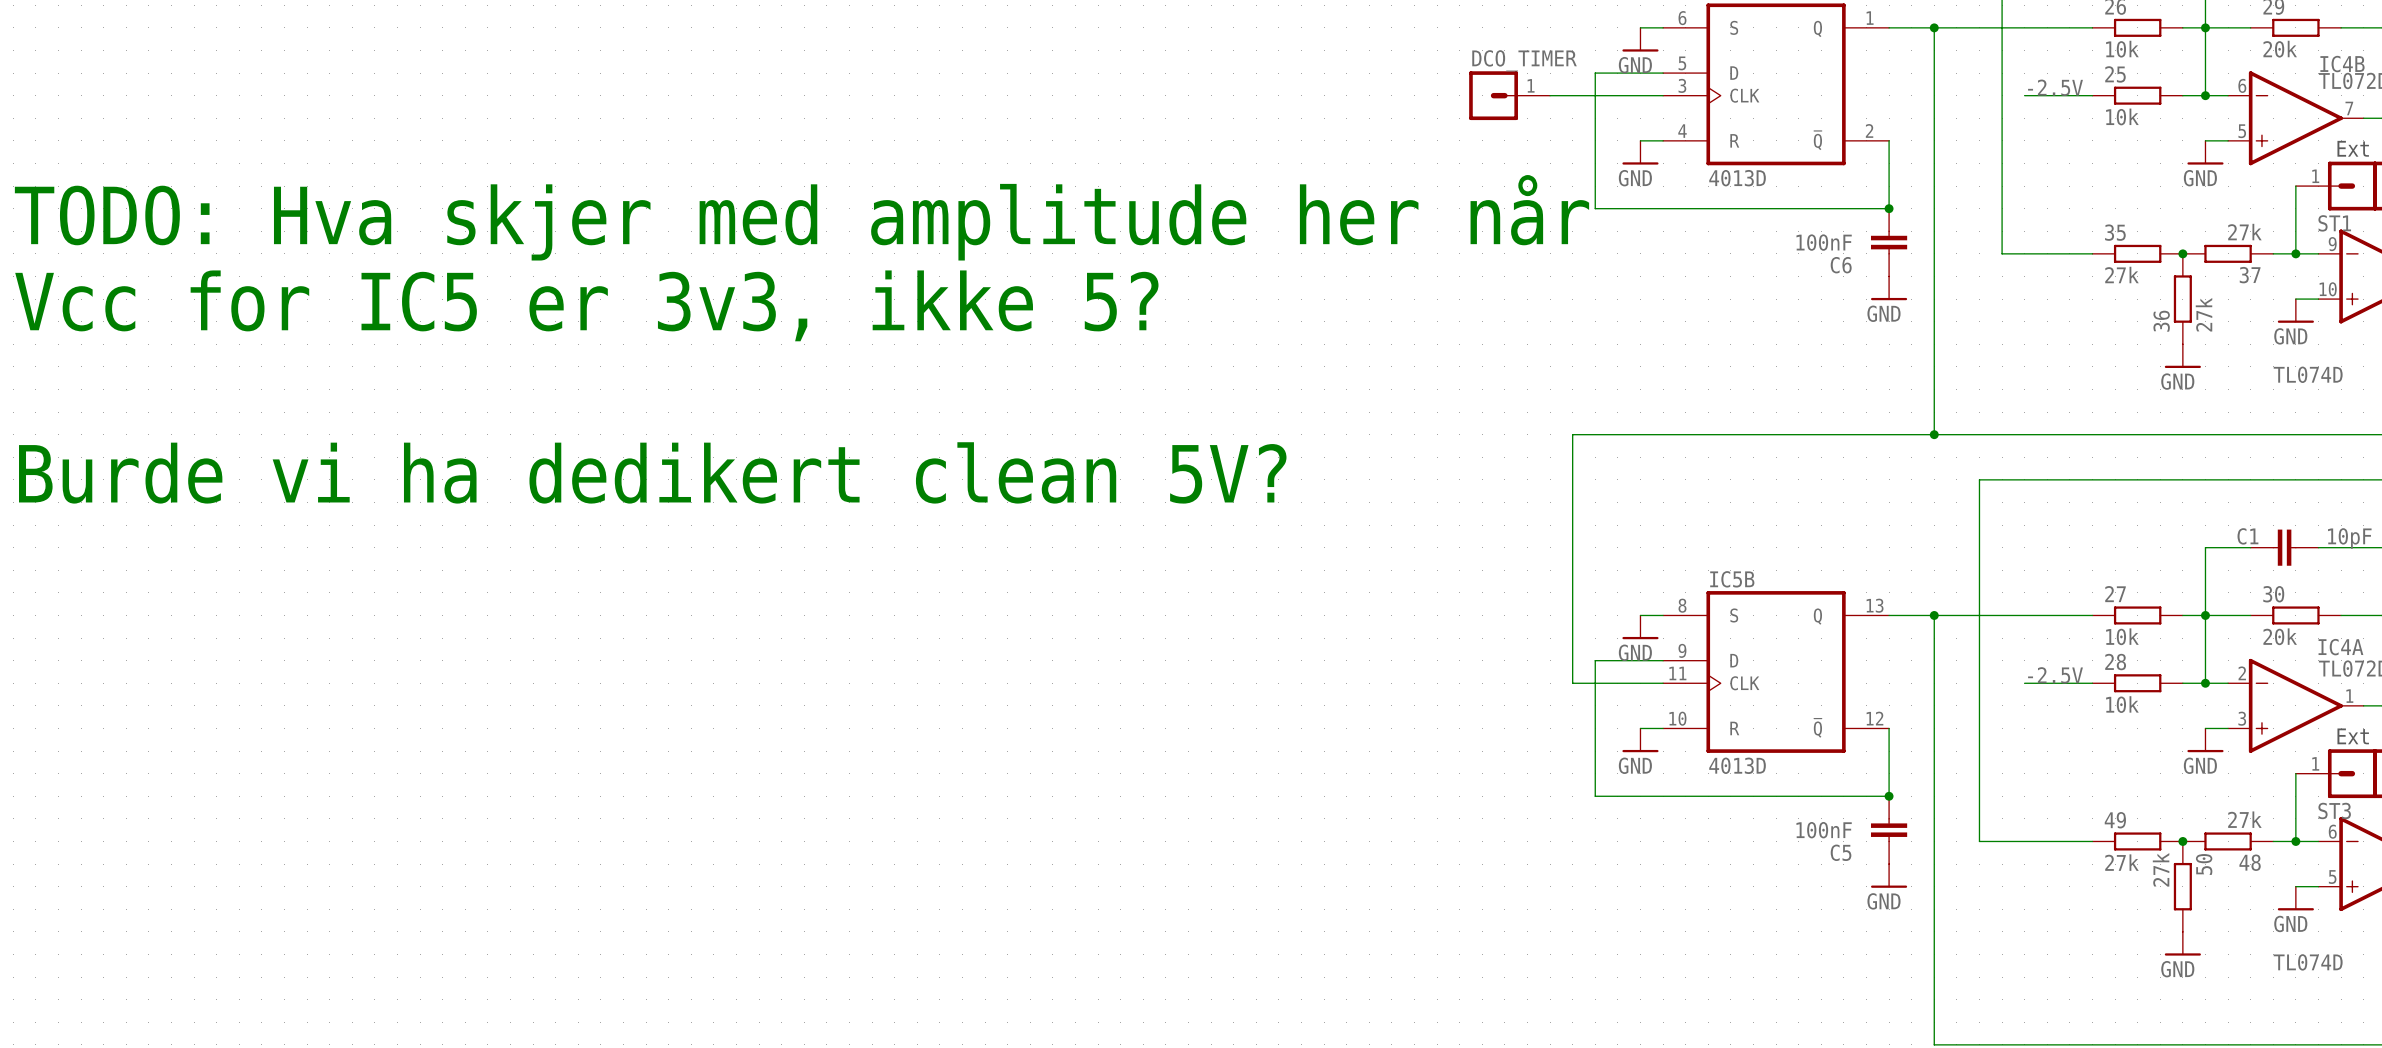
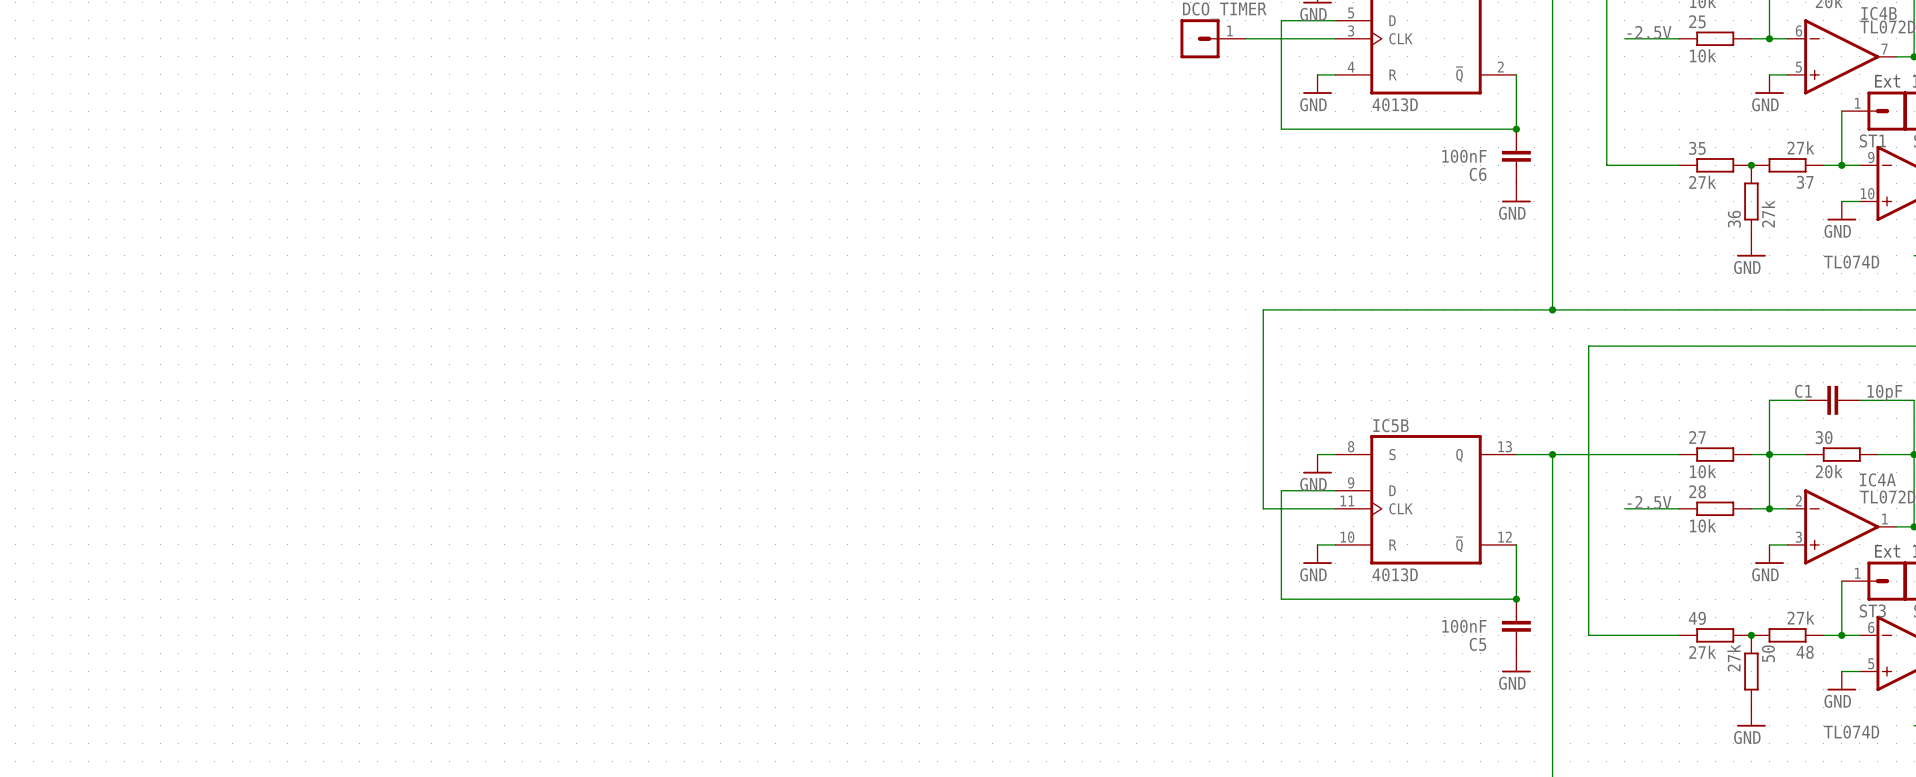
text: TODO: Hva skjer med amplitude her når (801, 217) -> none
text: Vcc for IC5 er 3v3, ikke 5? (586, 305) -> none
text: Burde vi ha dedikert clean 5V? (652, 472) -> none

